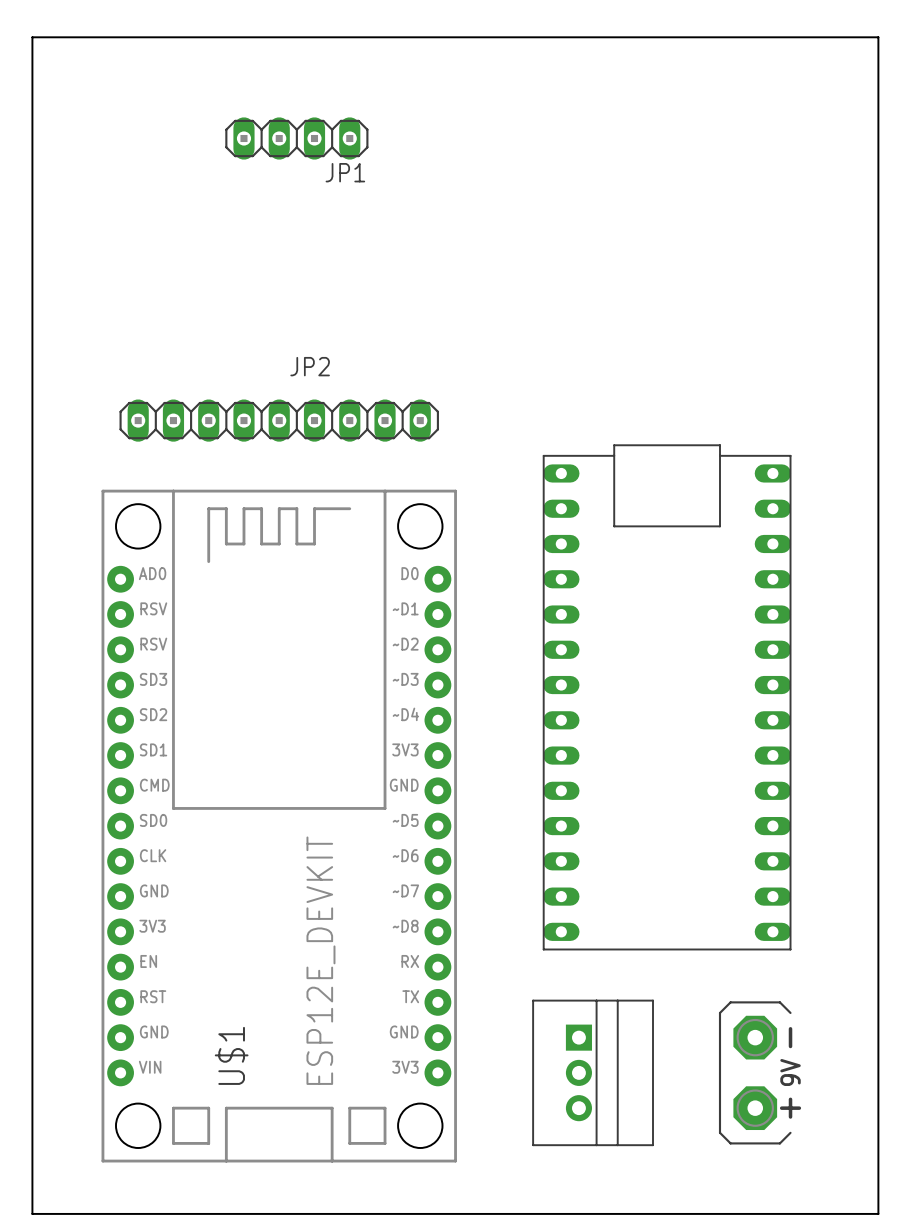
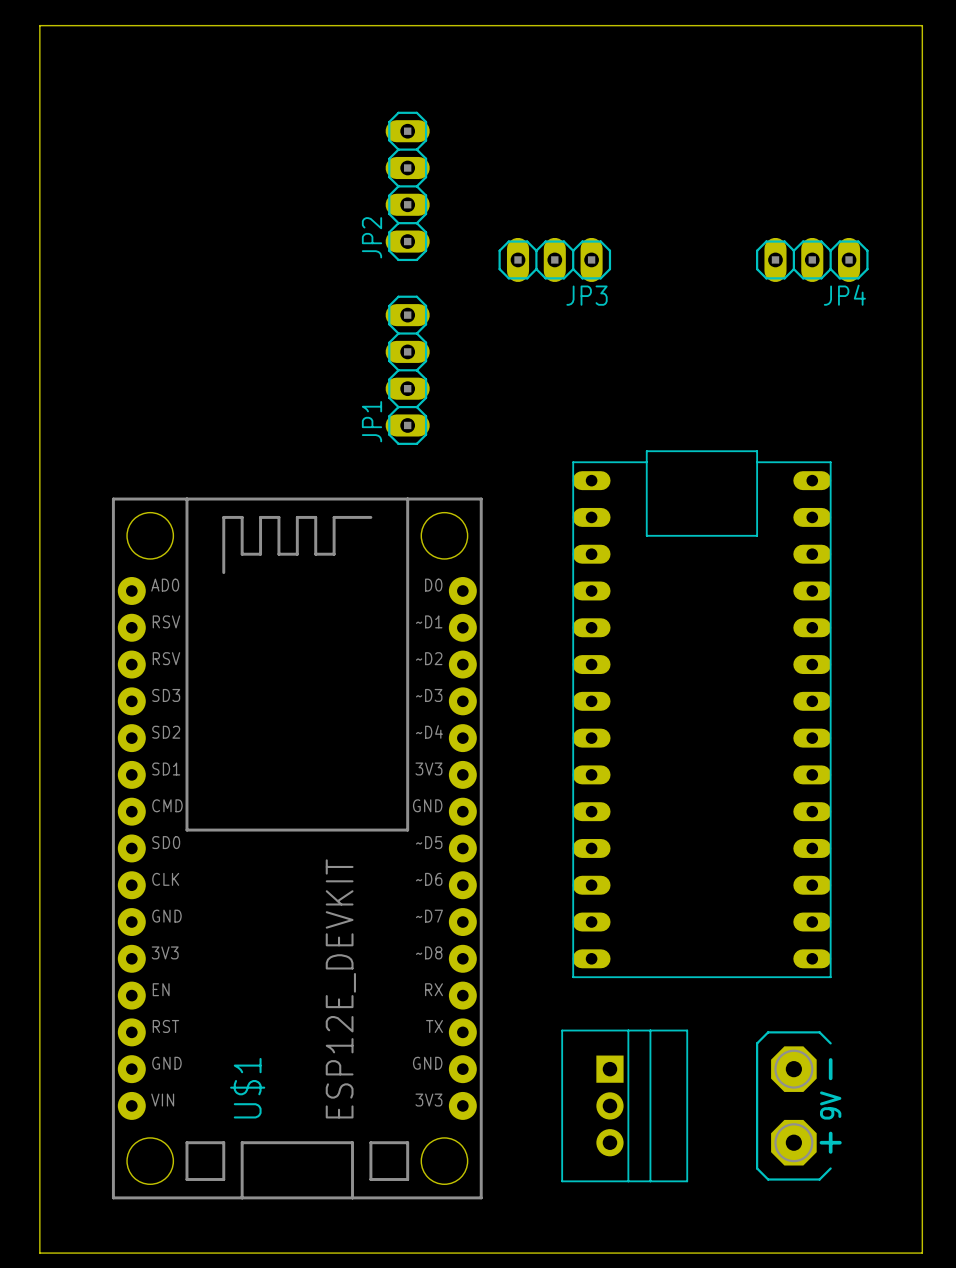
JP1 rotation: 0° (296, 138) -> 90° clockwise (407, 370)
JP1 position: (296, 138) -> (407, 370)
JP3: none -> (554, 259)
JP4: none -> (812, 259)
JP2 name position: JP2 (310, 366) -> JP2 (372, 237)
JP2 footprint: [119, 399, 439, 442] -> [385, 111, 430, 262]

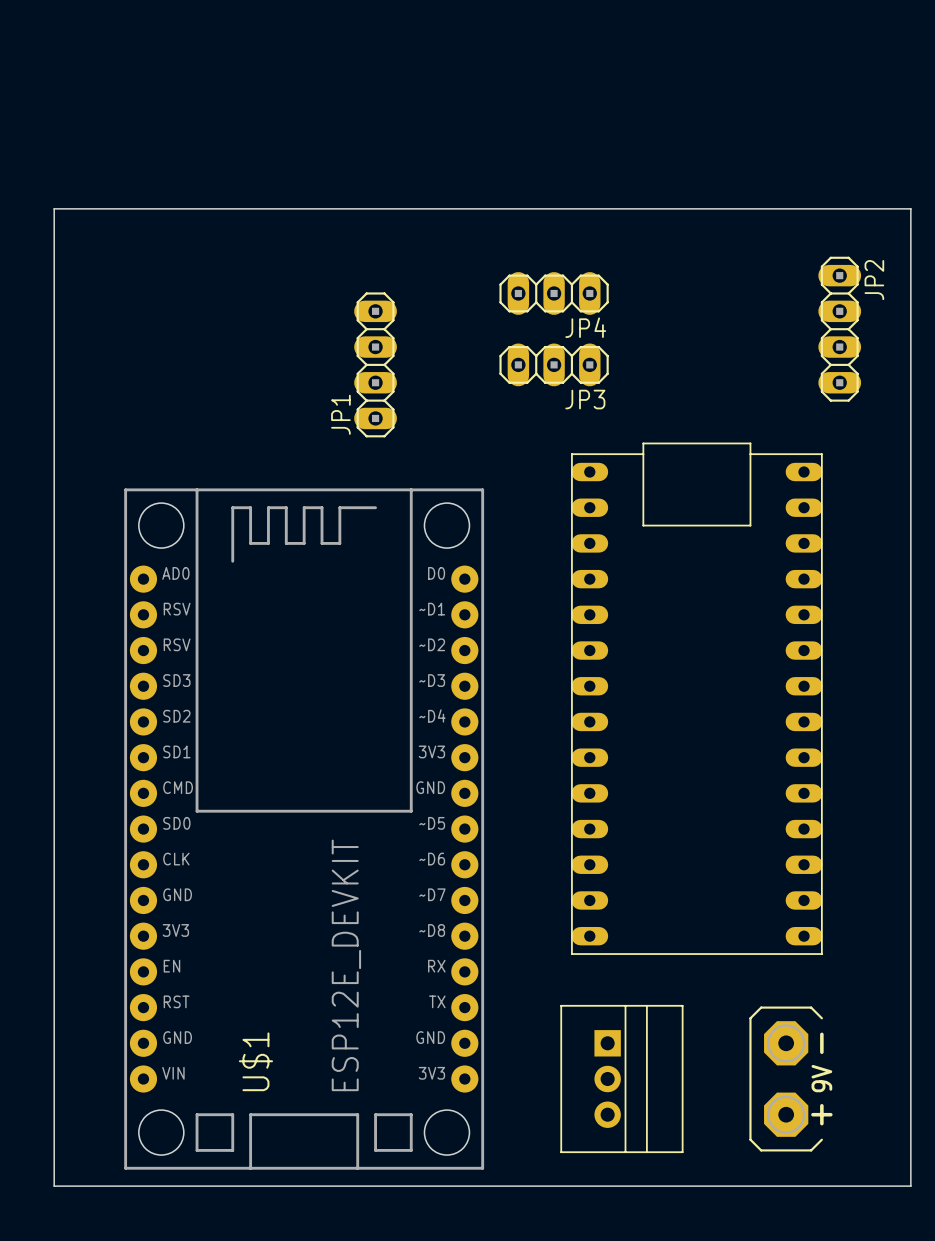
JP2 position: (407, 186) -> (839, 329)
board edge: (39, 209) (39, 25) (922, 25) (922, 209) -> (54, 208) (910, 208)
JP2 name position: JP2 (372, 237) -> JP2 (874, 280)
JP3 position: (554, 259) -> (554, 364)
JP4 position: (812, 259) -> (554, 293)
JP1 position: (407, 370) -> (375, 364)
board edge: (39, 1216) (39, 1253) (922, 1253) (922, 1216) -> (54, 1186) (910, 1186)

